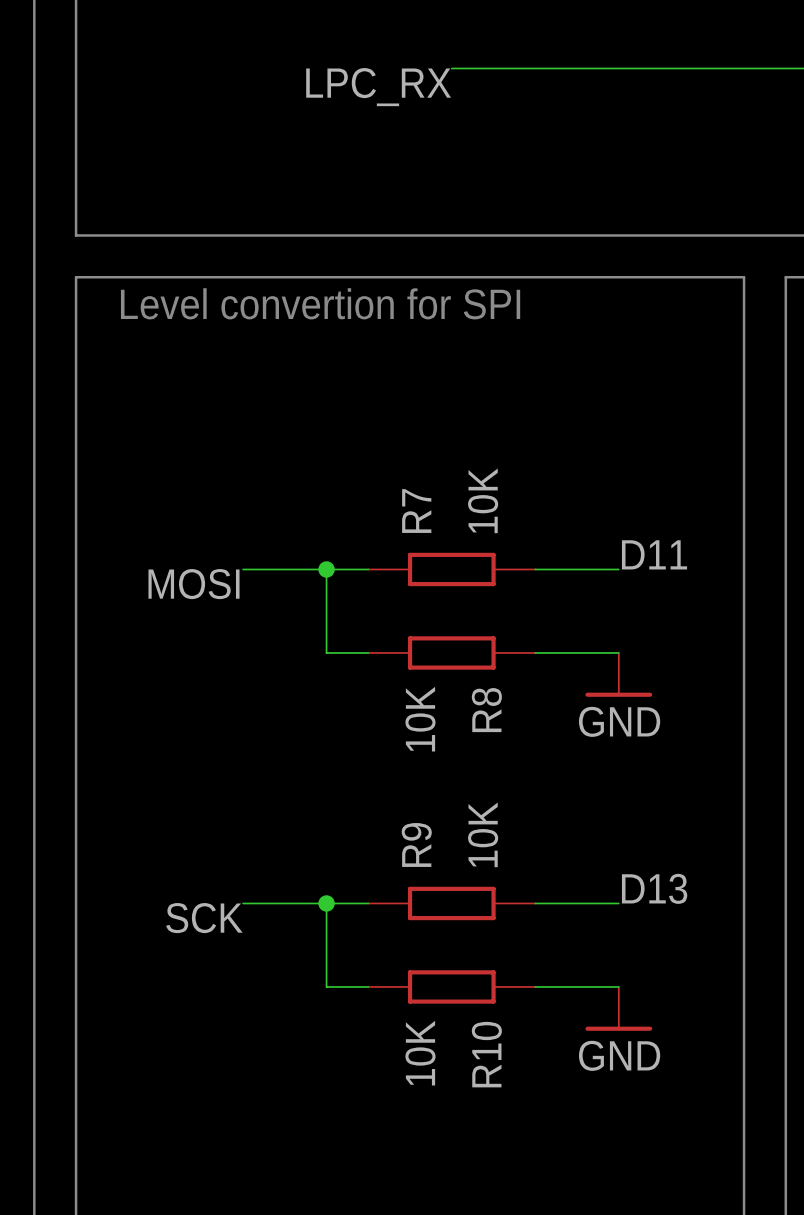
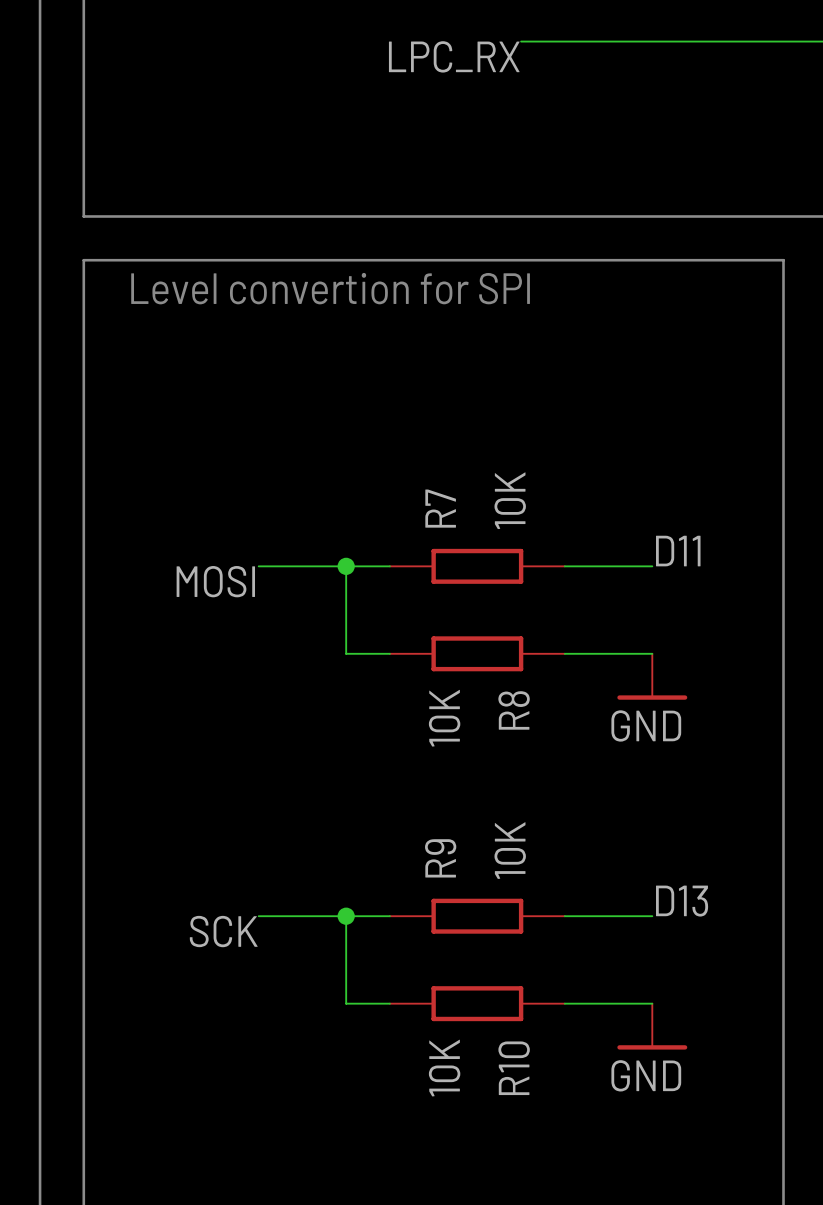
wire: (451, 68) (493, 68) -> none
label position: LPC_RX (378, 87) -> LPC_RX (454, 56)

